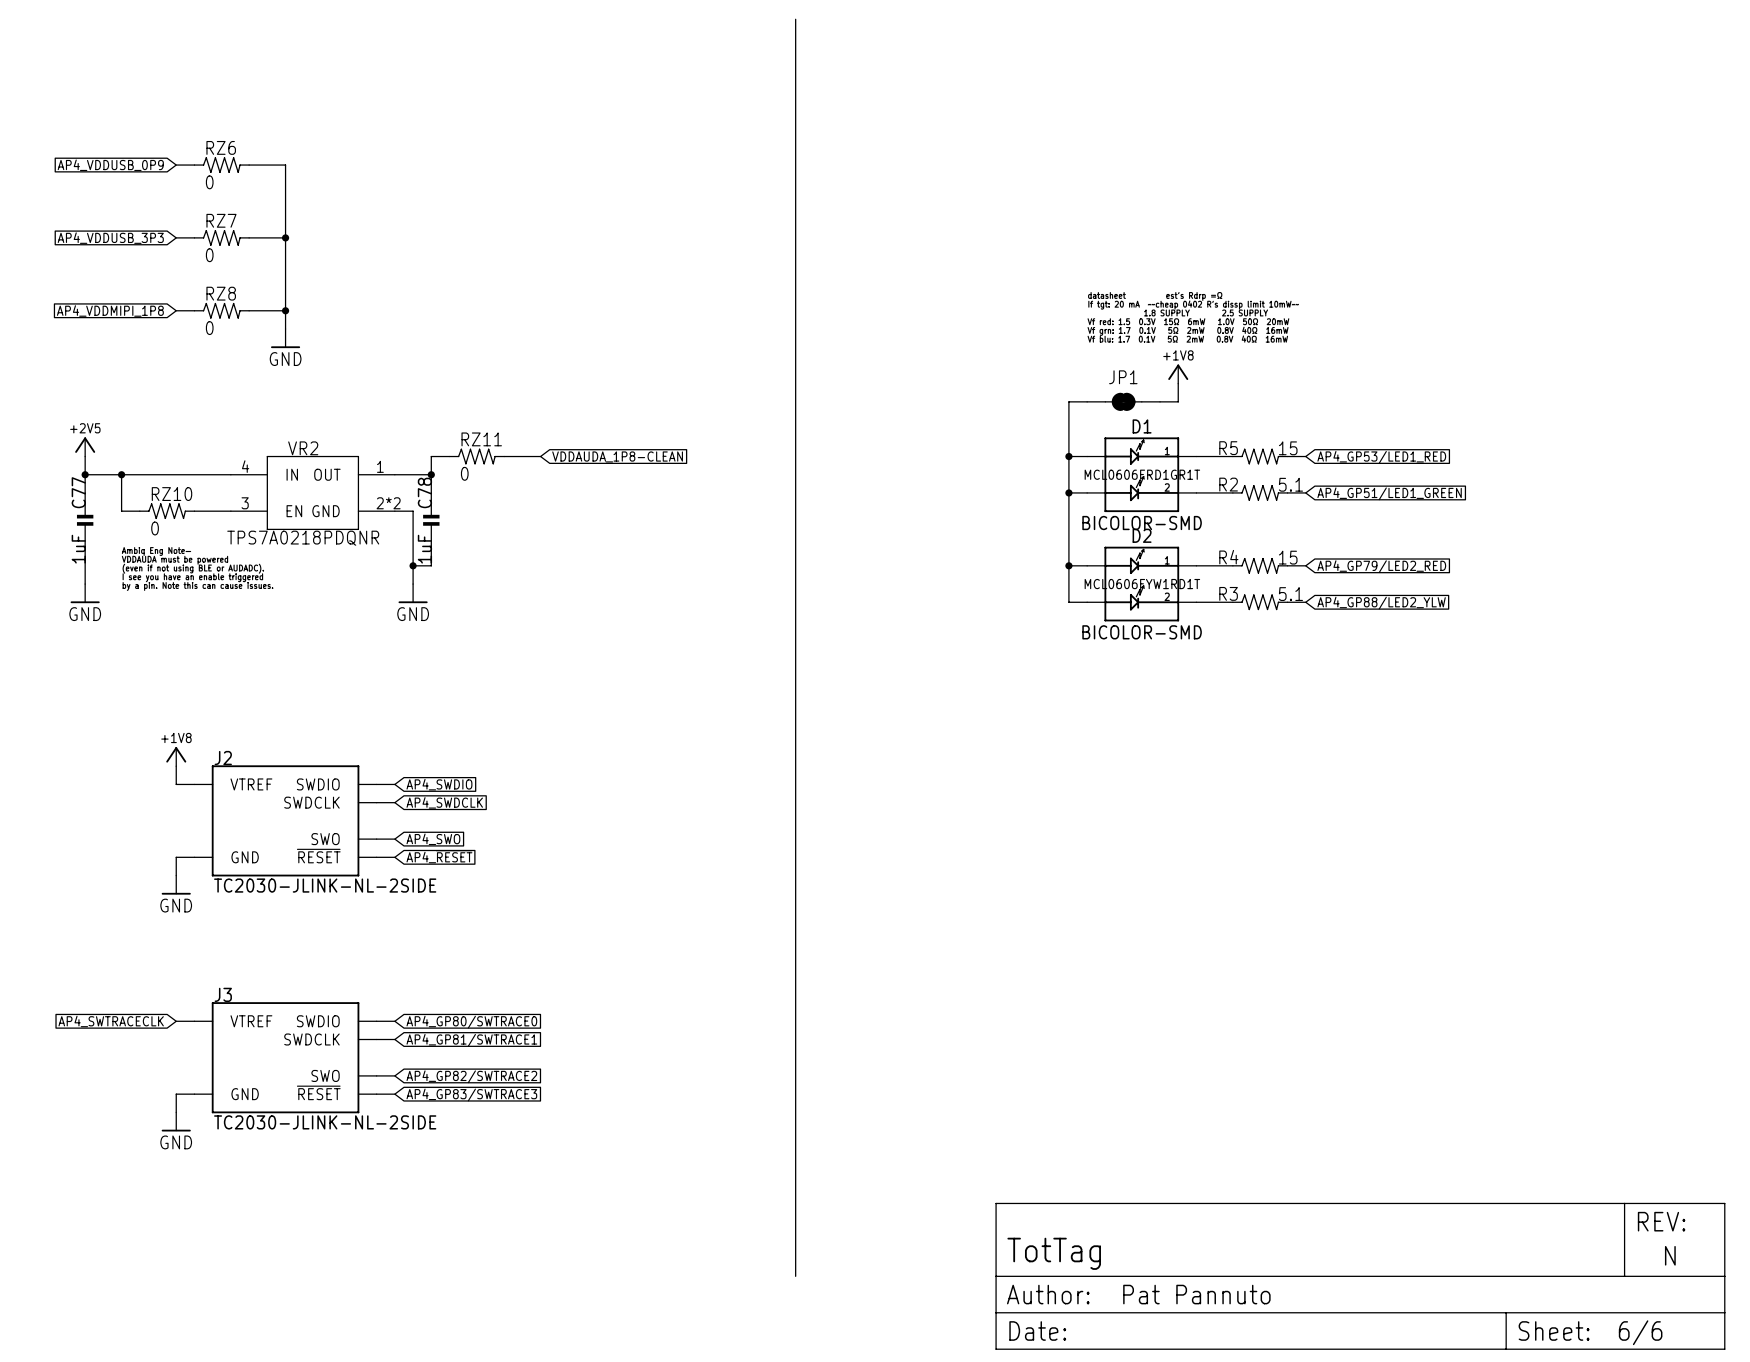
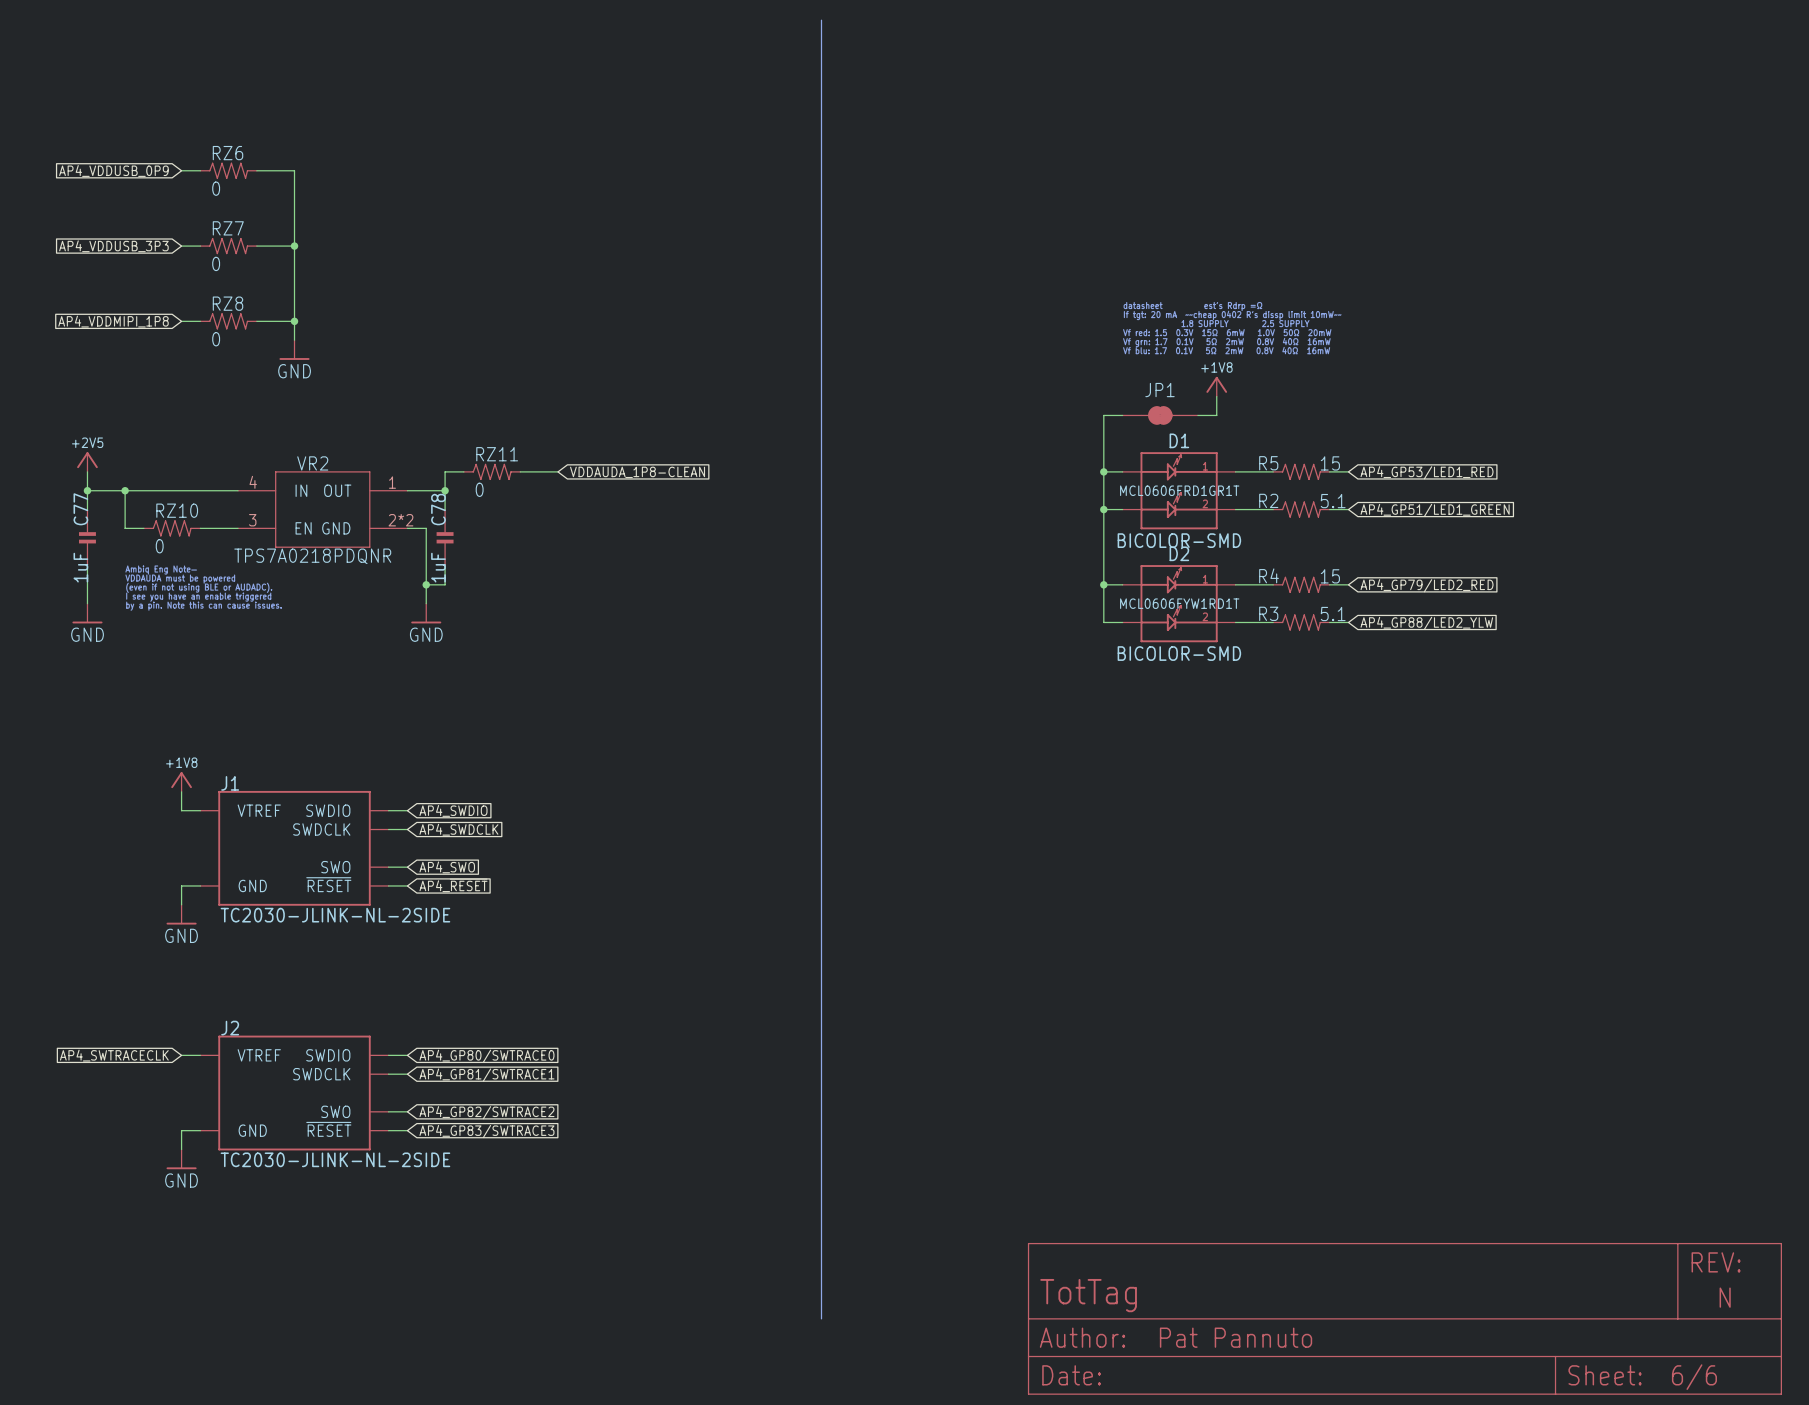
J2 name: J2 (223, 758) -> J1 (230, 783)
J3 name: J3 (223, 994) -> J2 (230, 1028)

